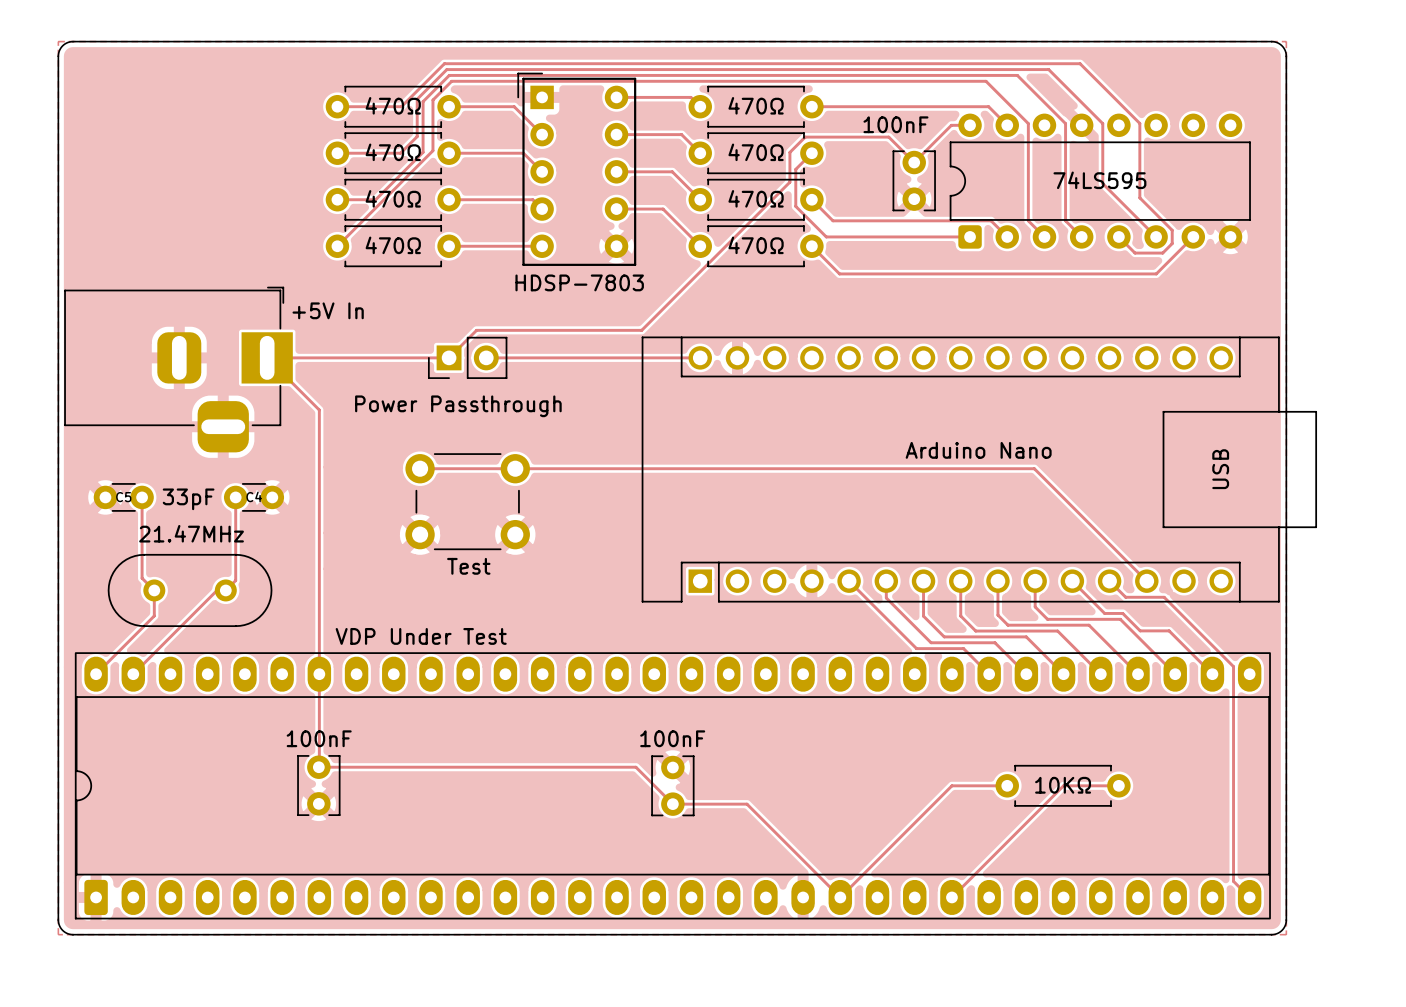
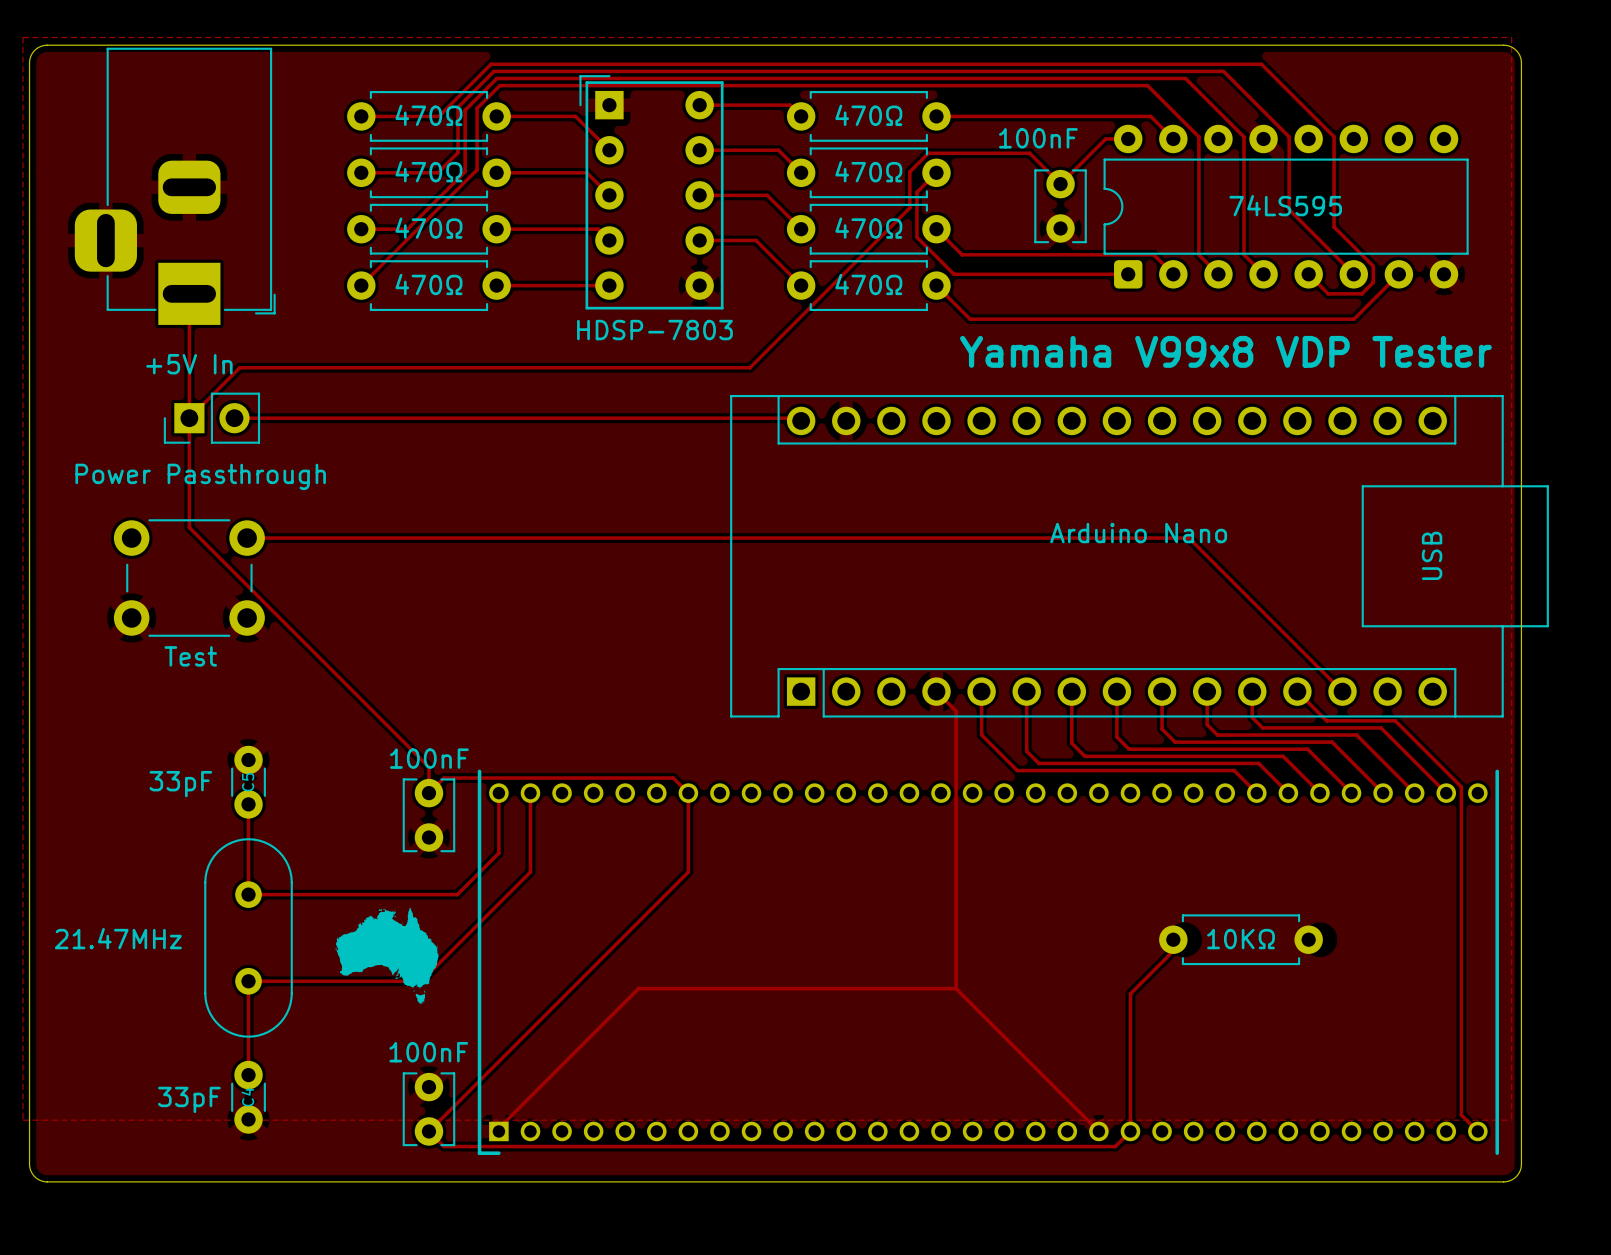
board edge: (73, 41) (1271, 41) (1280, 44) (1286, 56) (1286, 920) (1283, 929) (1271, 934) (73, 934) (63, 931) (58, 920) (58, 56) (62, 45) (73, 41) -> (47, 45) (34, 50) (29, 62) (29, 1164) (31, 1171) (36, 1178) (47, 1181) (1503, 1181) (1511, 1180) (1517, 1175) (1521, 1164) (1521, 62) (1519, 55) (1514, 49) (1503, 45) (47, 45)
track: none -> (189, 293) (189, 527) (428, 767) (428, 793) (444, 778) (673, 778) (688, 793) (688, 872) (428, 1131) (444, 1146) (1115, 1146) (1130, 1131) (1130, 993) (1184, 939)
text: none -> Yamaha V99x8 VDP Tester (1225, 351)
part value position: +5V In (328, 310) -> +5V In (189, 364)
track: (658, 314) (641, 330) (476, 330) (449, 357) (267, 357) (319, 410) (318, 767) (635, 767) (672, 804) (746, 804) (840, 897) (951, 785) (1007, 785) -> (749, 367) (239, 367) (189, 418)
part position: (467, 357) -> (211, 418)
track: (486, 357) (700, 357) -> (234, 418) (798, 418) (801, 420)
part rotation: 0° (178, 369) -> 90° clockwise (175, 186)
part position: (178, 369) -> (175, 186)
track: (420, 468) (1034, 468) -> (247, 538) (1188, 538) (1206, 555)
C5 rotation: 0° (123, 497) -> 90° clockwise (248, 782)
C5 position: (123, 497) -> (248, 782)
track: (142, 497) (142, 578) (154, 590) (154, 615) (96, 674) -> none
track: (235, 497) (235, 580) (225, 590) (217, 590) (133, 674) -> none
C4 rotation: 0° (254, 497) -> 90° clockwise (248, 1097)
C4 position: (254, 497) -> (248, 1097)
C5 value position: 33pF (188, 499) -> 33pF (180, 784)
part position: (467, 501) -> (189, 578)
part value position: 21.47MHz (191, 533) -> 21.47MHz (118, 938)
track: none -> (936, 691) (956, 711) (956, 988)
track: (849, 581) (916, 648) (963, 648) (989, 674) -> (981, 691) (981, 734) (1017, 770) (1234, 770) (1256, 793)
track: (1072, 581) (1104, 613) (1122, 613) (1140, 630) (1169, 630) (1212, 674) -> (1252, 691) (1252, 717) (1262, 727) (1381, 727) (1446, 793)
part rotation: 0° (190, 590) -> 90° clockwise (248, 937)
part position: (190, 590) -> (248, 937)
track: (1125, 597) (1164, 597) (1233, 666) (1233, 881) (1249, 897) -> (1316, 711) (1326, 720) (1395, 720) (1461, 786) (1461, 1114) (1477, 1131)
track: (886, 598) (931, 642) (994, 642) (1026, 674) -> (1026, 712) (1026, 751) (1038, 763) (1258, 763) (1288, 793)
track: (1035, 606) (1047, 619) (1120, 619) (1175, 674) -> (1207, 722) (1217, 735) (1356, 735) (1414, 793)
track: (997, 612) (997, 615) (1007, 625) (1089, 625) (1138, 674) -> (1162, 729) (1175, 742) (1332, 742) (1383, 793)
track: (923, 616) (944, 636) (1026, 636) (1063, 674) -> (1071, 734) (1071, 743) (1084, 756) (1283, 756) (1319, 793)
track: (960, 616) (975, 631) (1057, 631) (1100, 674) -> (1116, 733) (1116, 737) (1129, 749) (1307, 749) (1351, 793)
track: none -> (498, 793) (498, 853) (457, 894) (248, 894) (248, 804)
track: none -> (530, 793) (530, 872) (421, 981) (248, 981) (248, 1075)
part: none -> 100nF (428, 815)
drawing: none -> [334, 906, 439, 1004]
part: 100nF (318, 785) -> none
part: 100nF (672, 785) -> none
part: VDP Under Test (672, 785) -> none
track: (1118, 785) (1063, 785) (951, 897) -> none
part: none -> (988, 962)
track: none -> (956, 988) (638, 988) (498, 1128) (498, 1131)
track: none -> (956, 988) (1098, 1131)
C4 value: none -> 33pF (189, 1099)
part: none -> 100nF (428, 1109)

